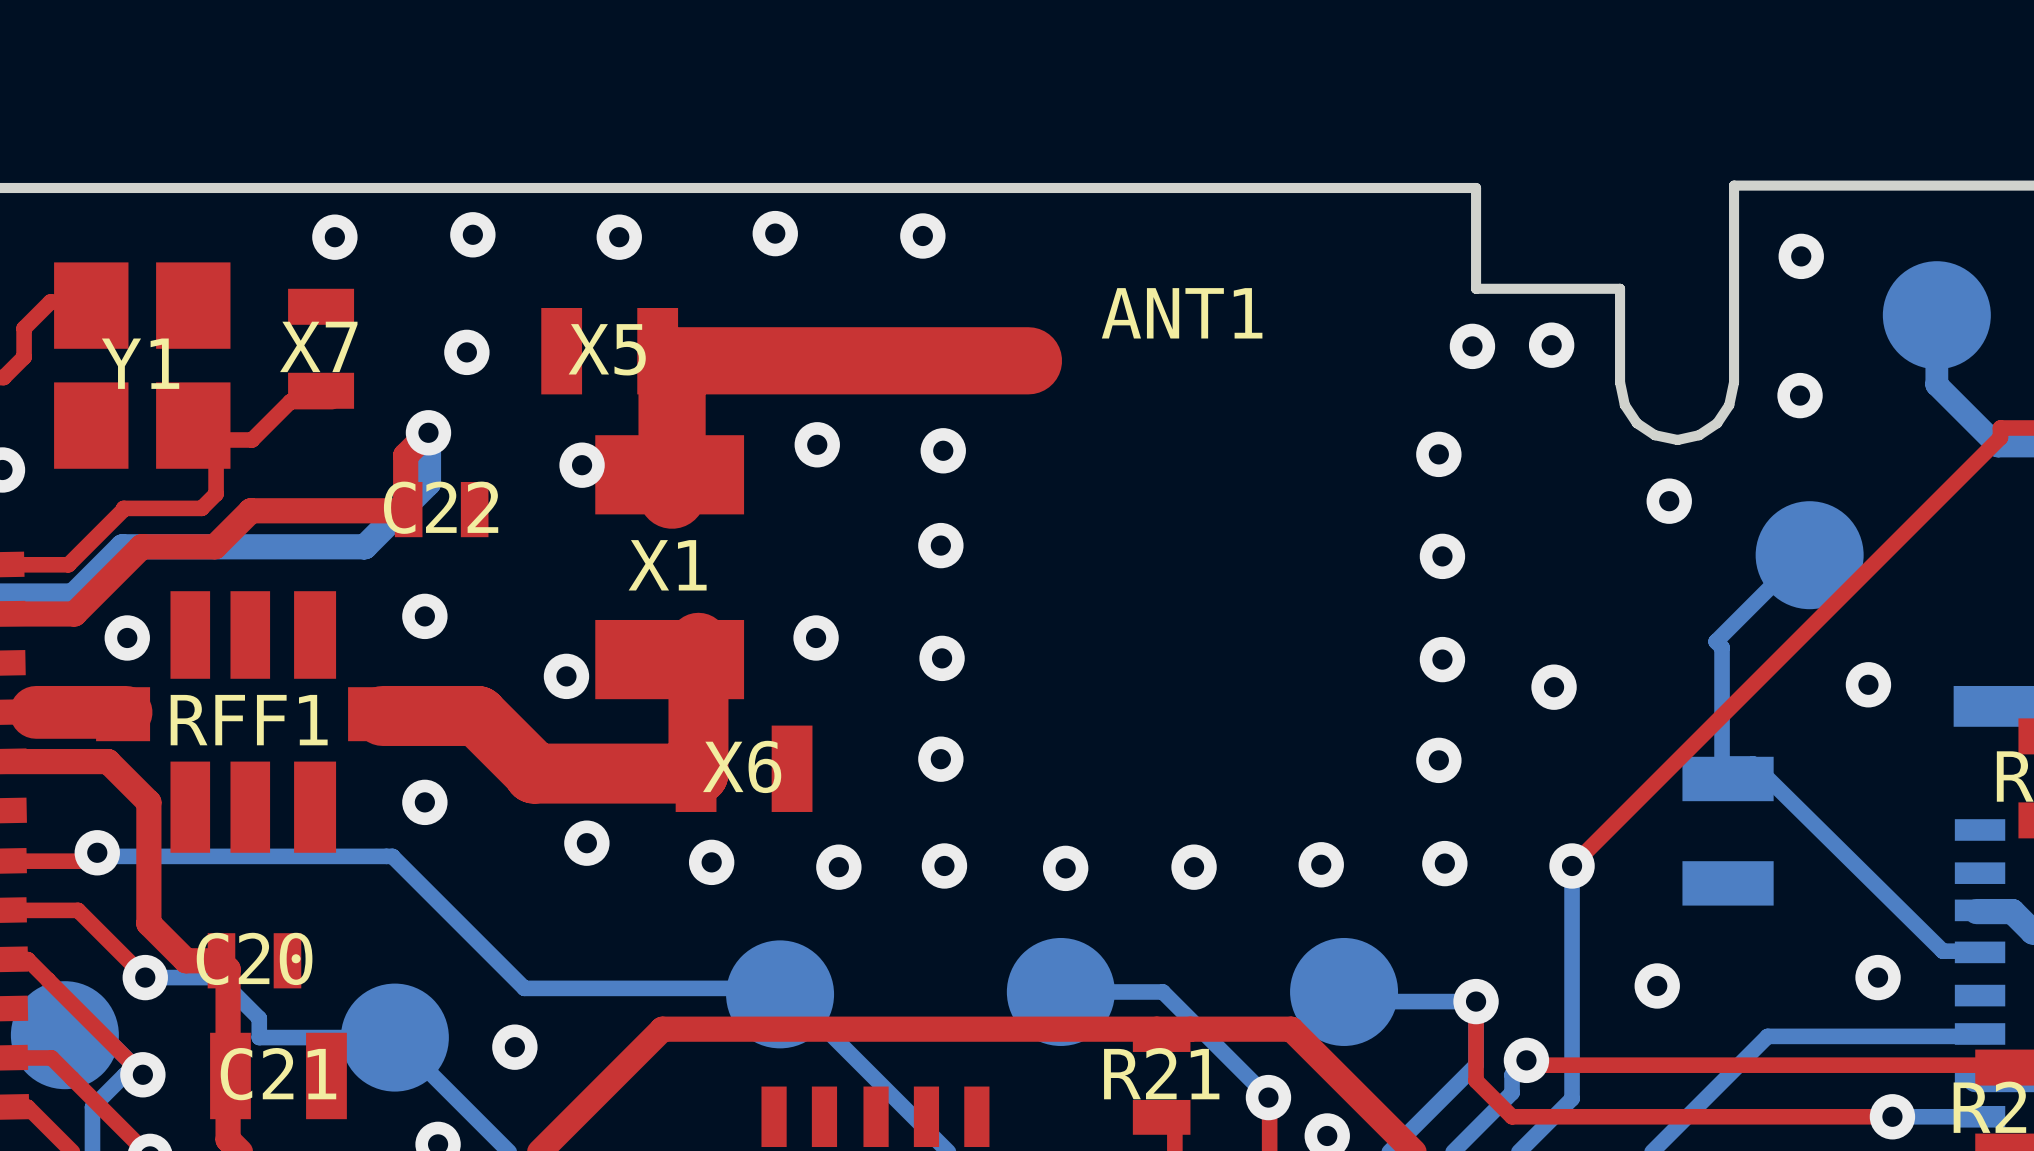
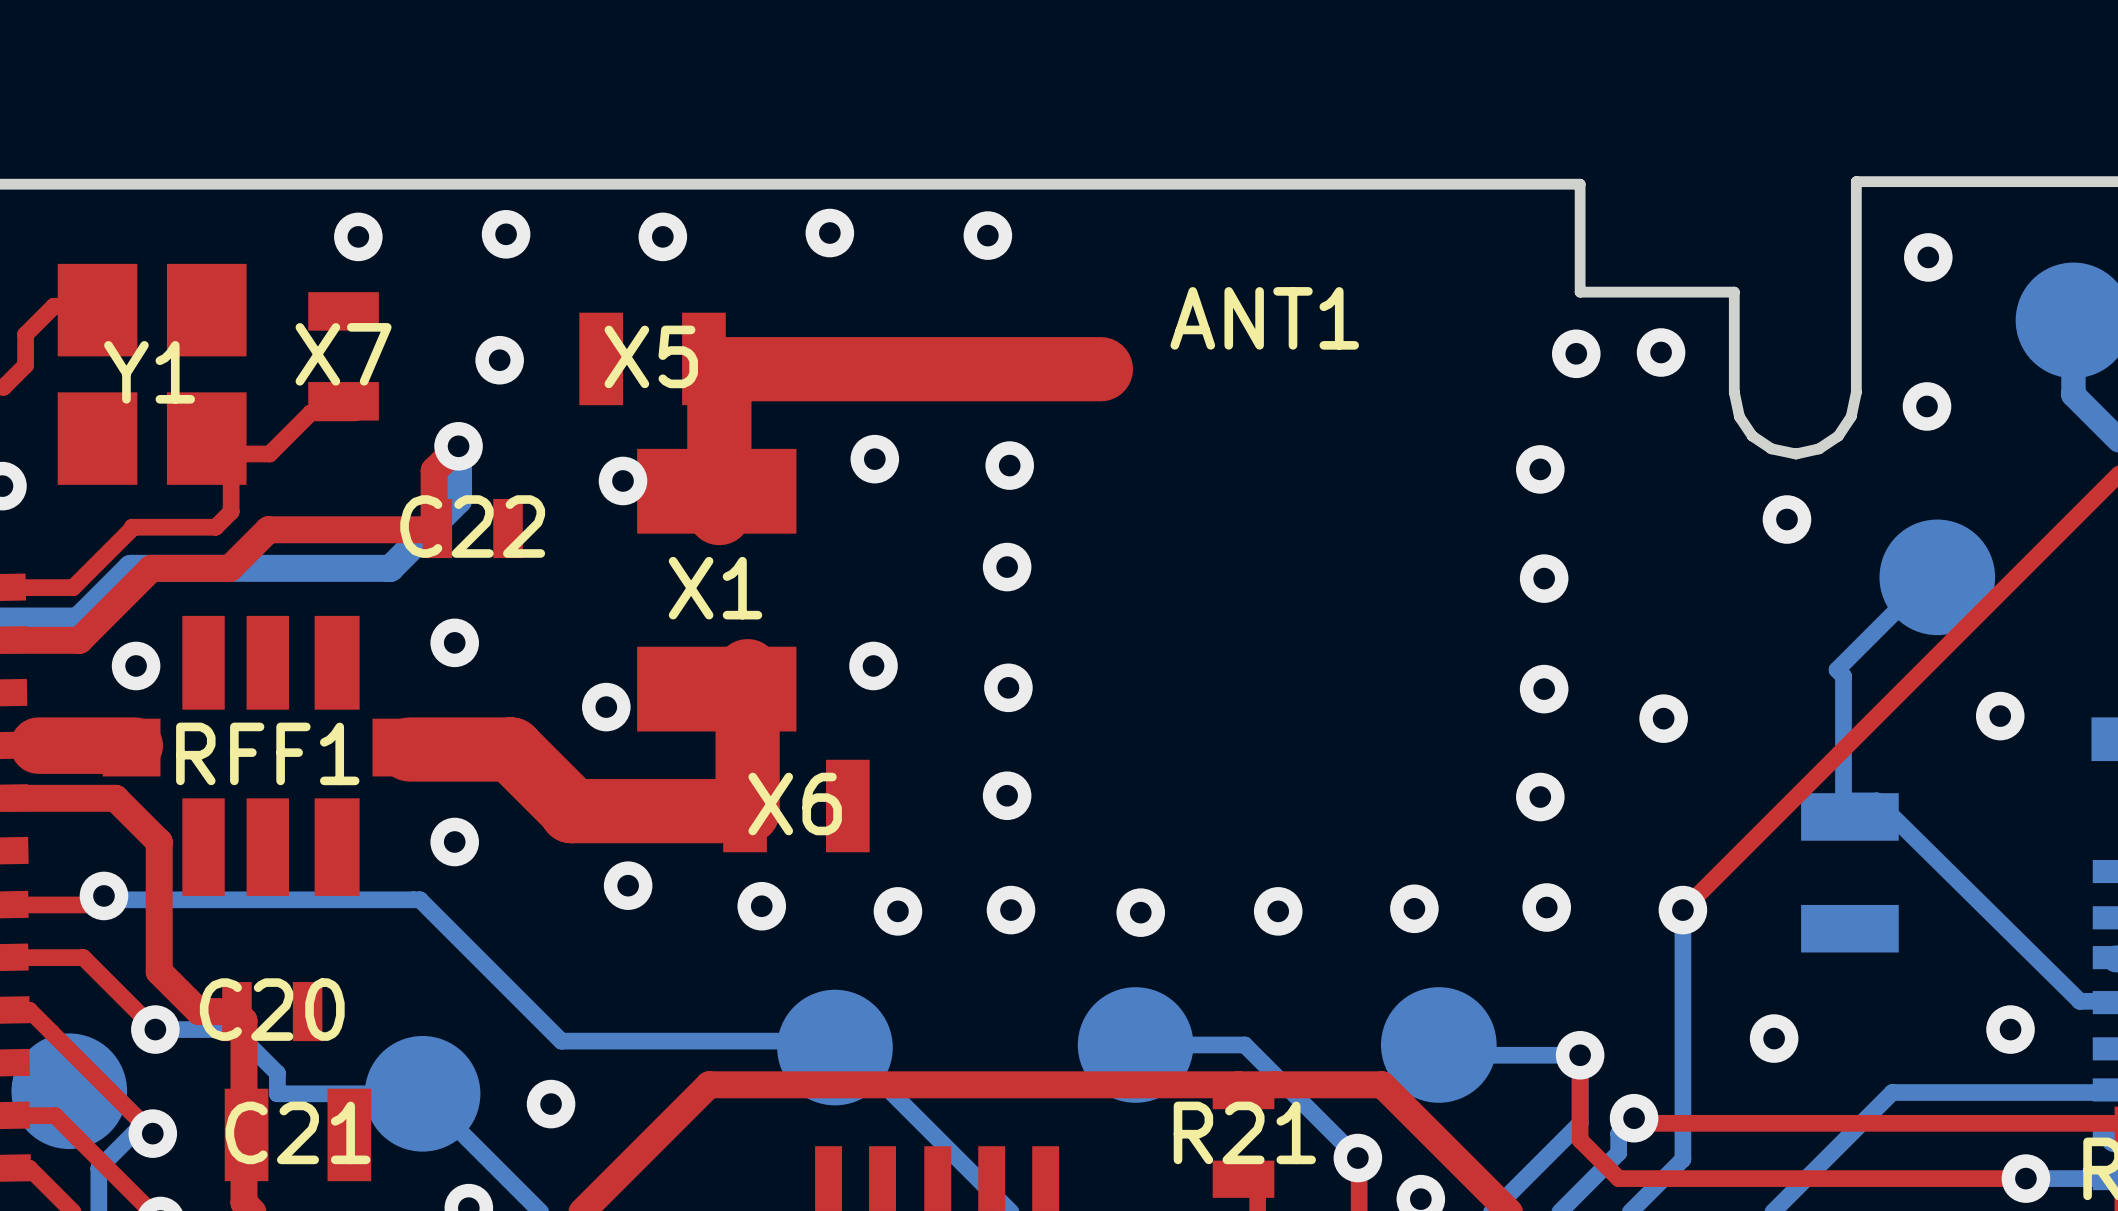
top track width: thick (1028, 360) (672, 360) (672, 495) -> thin (1100, 369) (719, 369) (719, 513)

